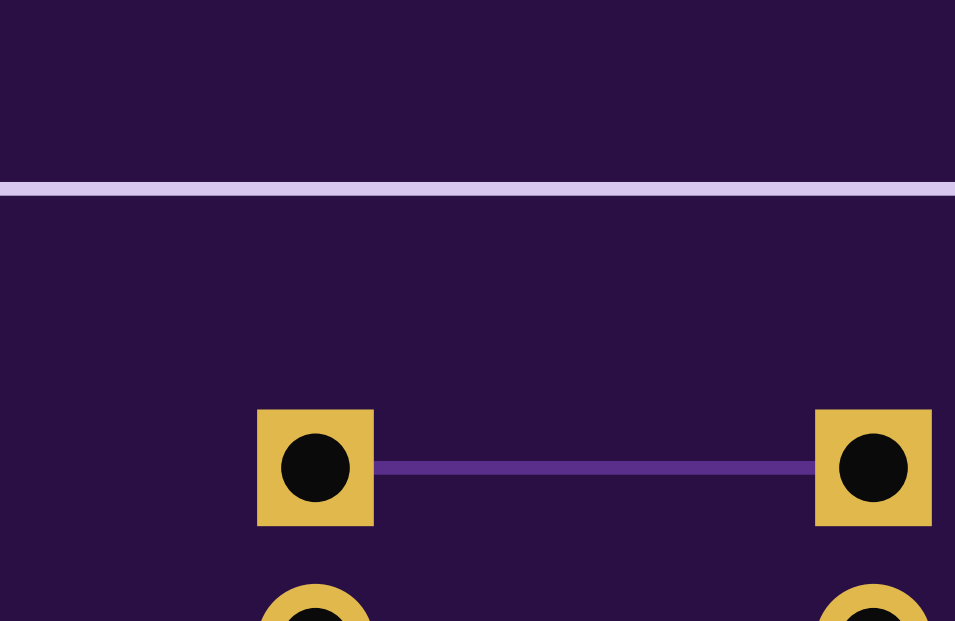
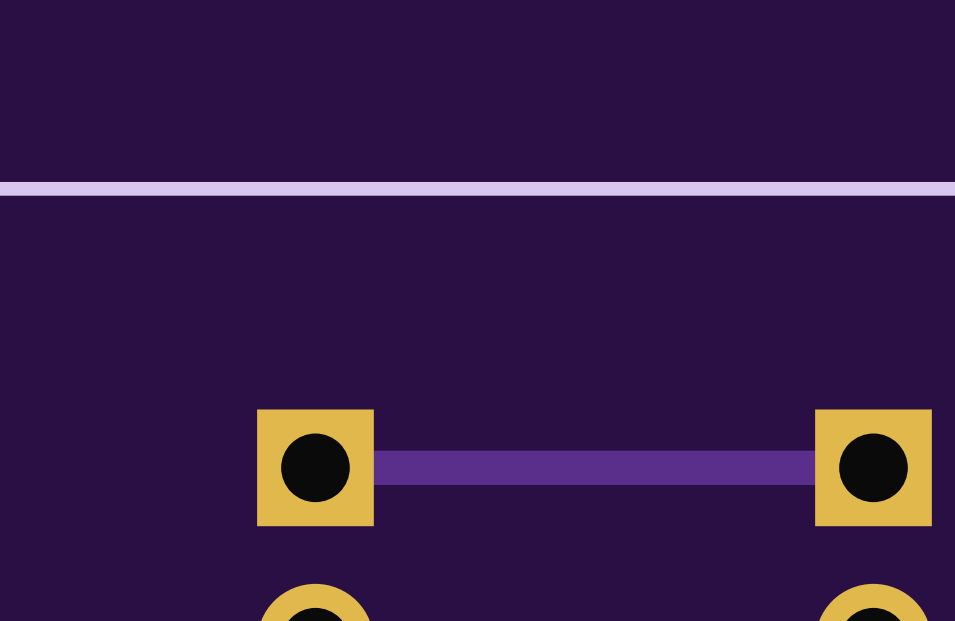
track width: thin (873, 467) (315, 467) -> thick (873, 467) (315, 467)

